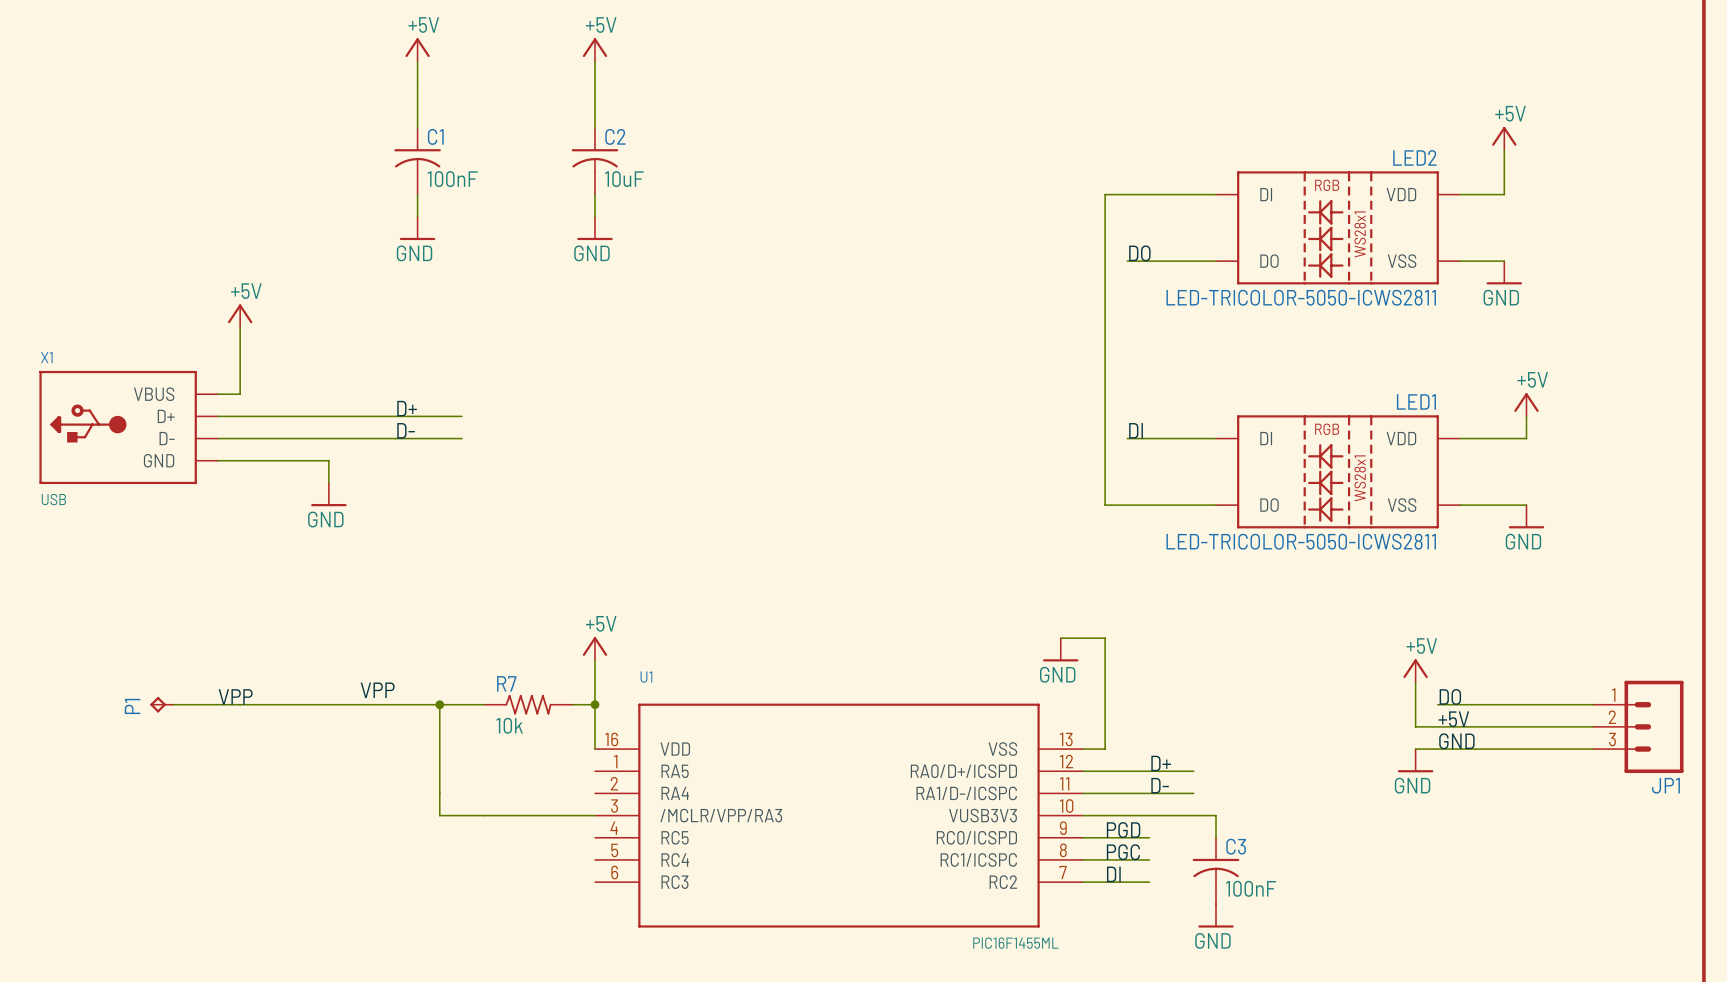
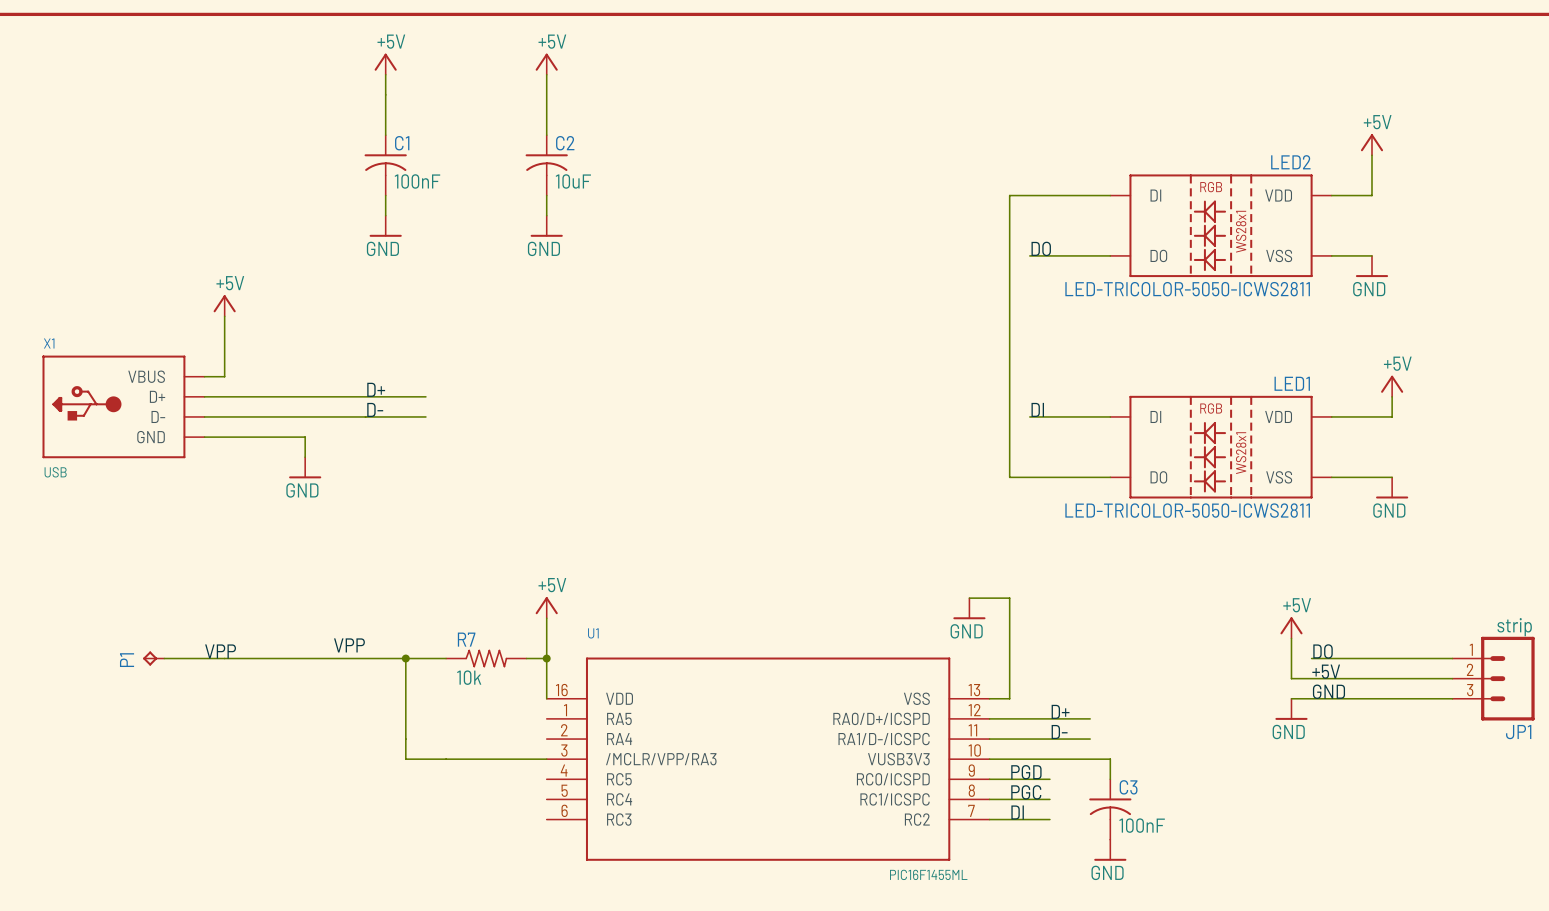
JP1 value: none -> strip (1514, 627)

